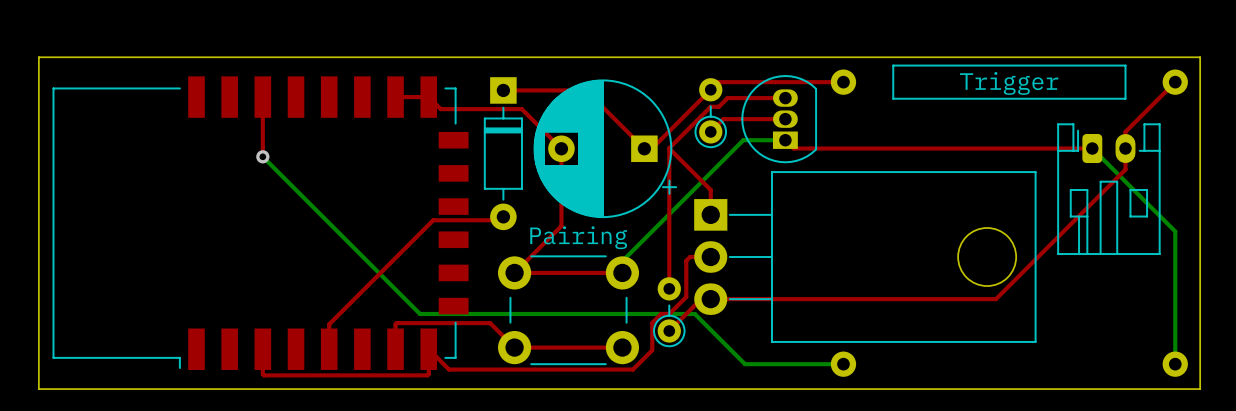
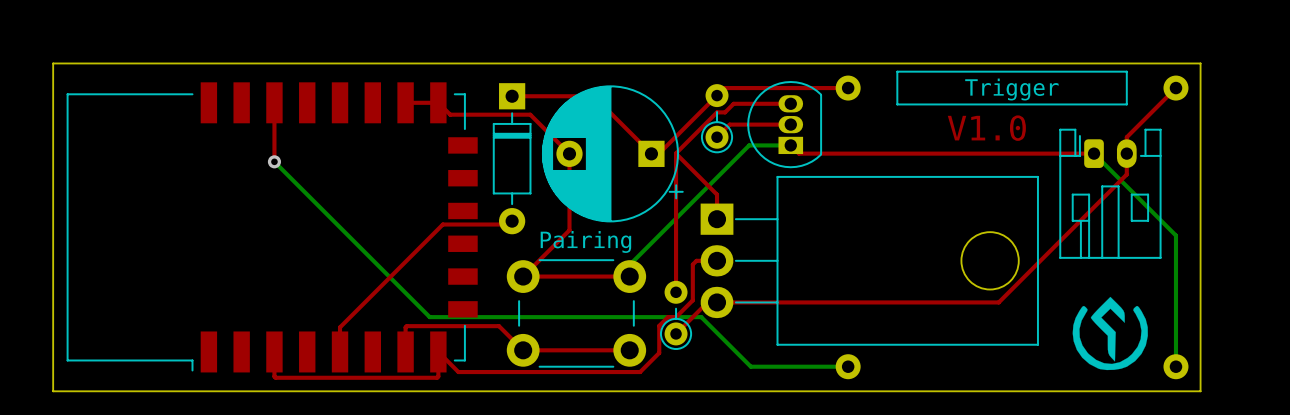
text: none -> V1.0 (986, 128)
drawing: none -> [1072, 296, 1148, 371]

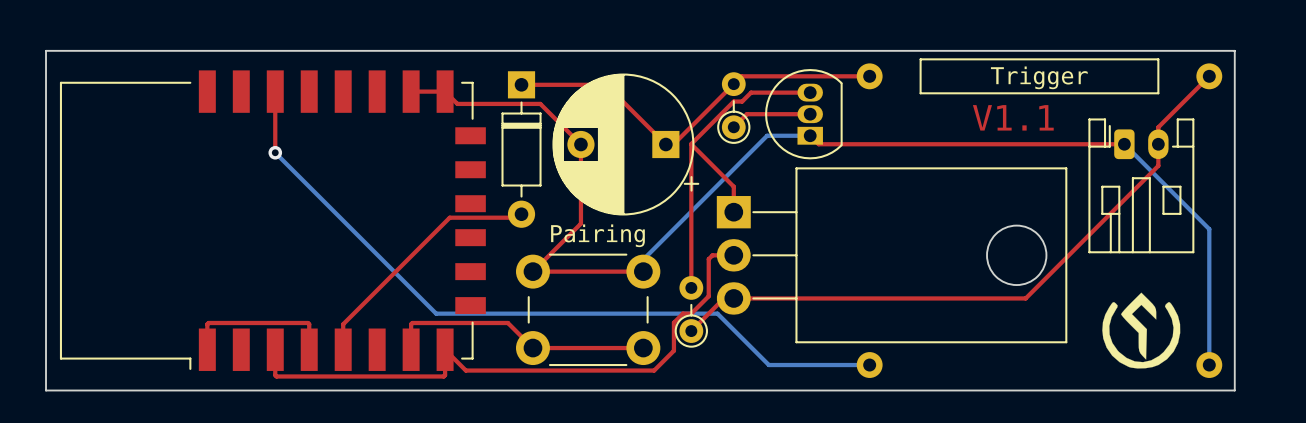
text: V1.0 (986, 128) -> V1.1 (1013, 117)
top track: none -> (207, 349) (208, 322) (307, 322) (309, 349)

